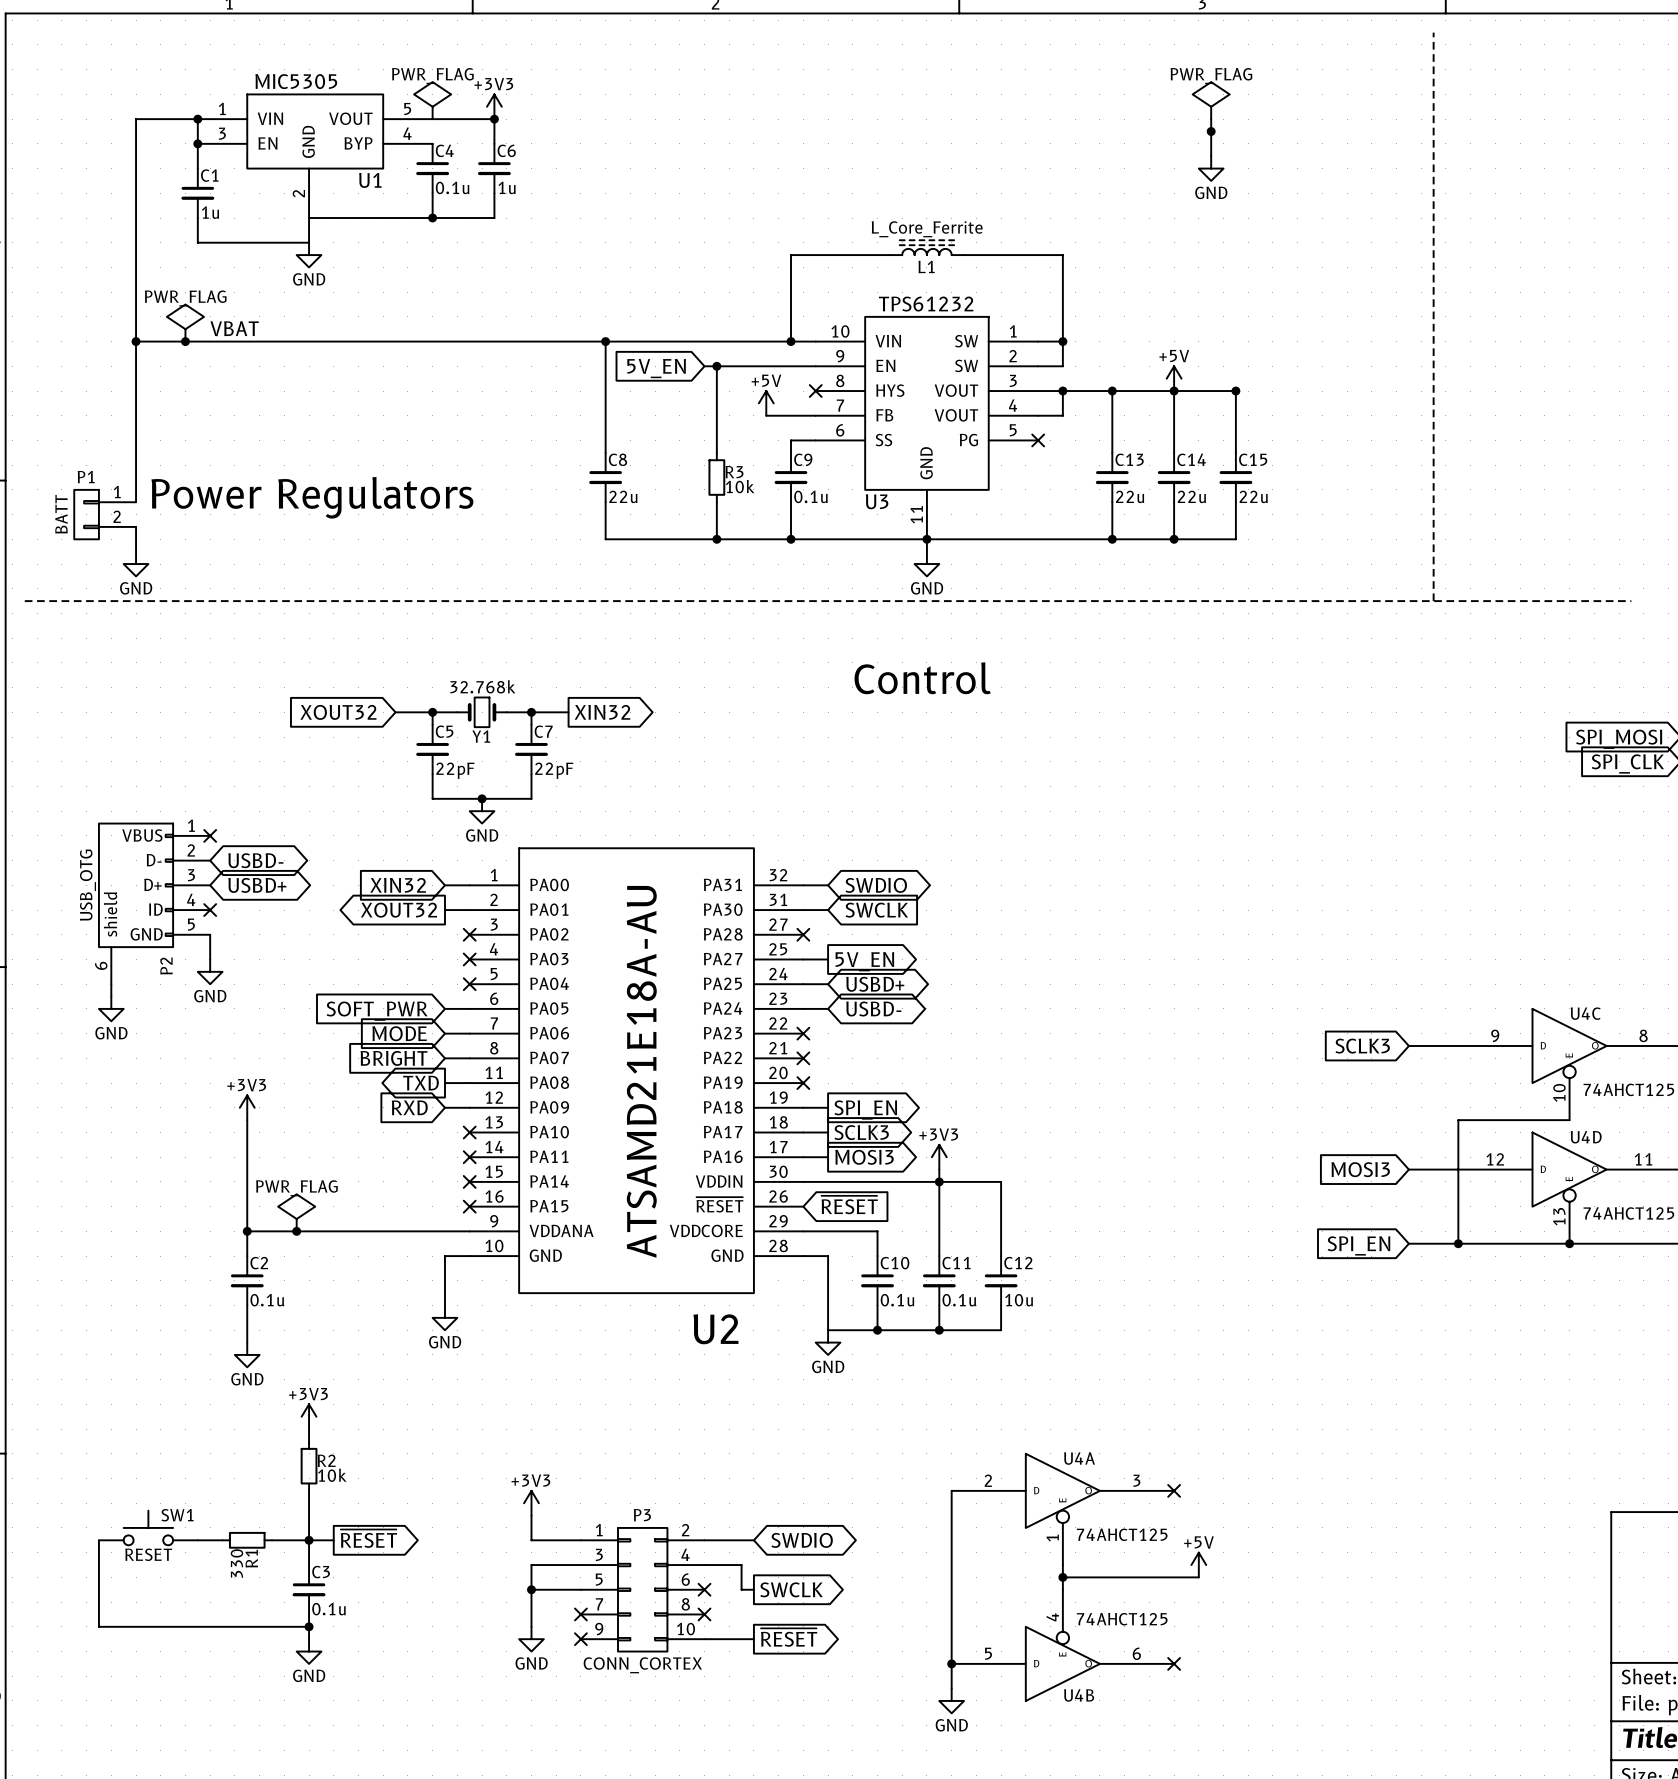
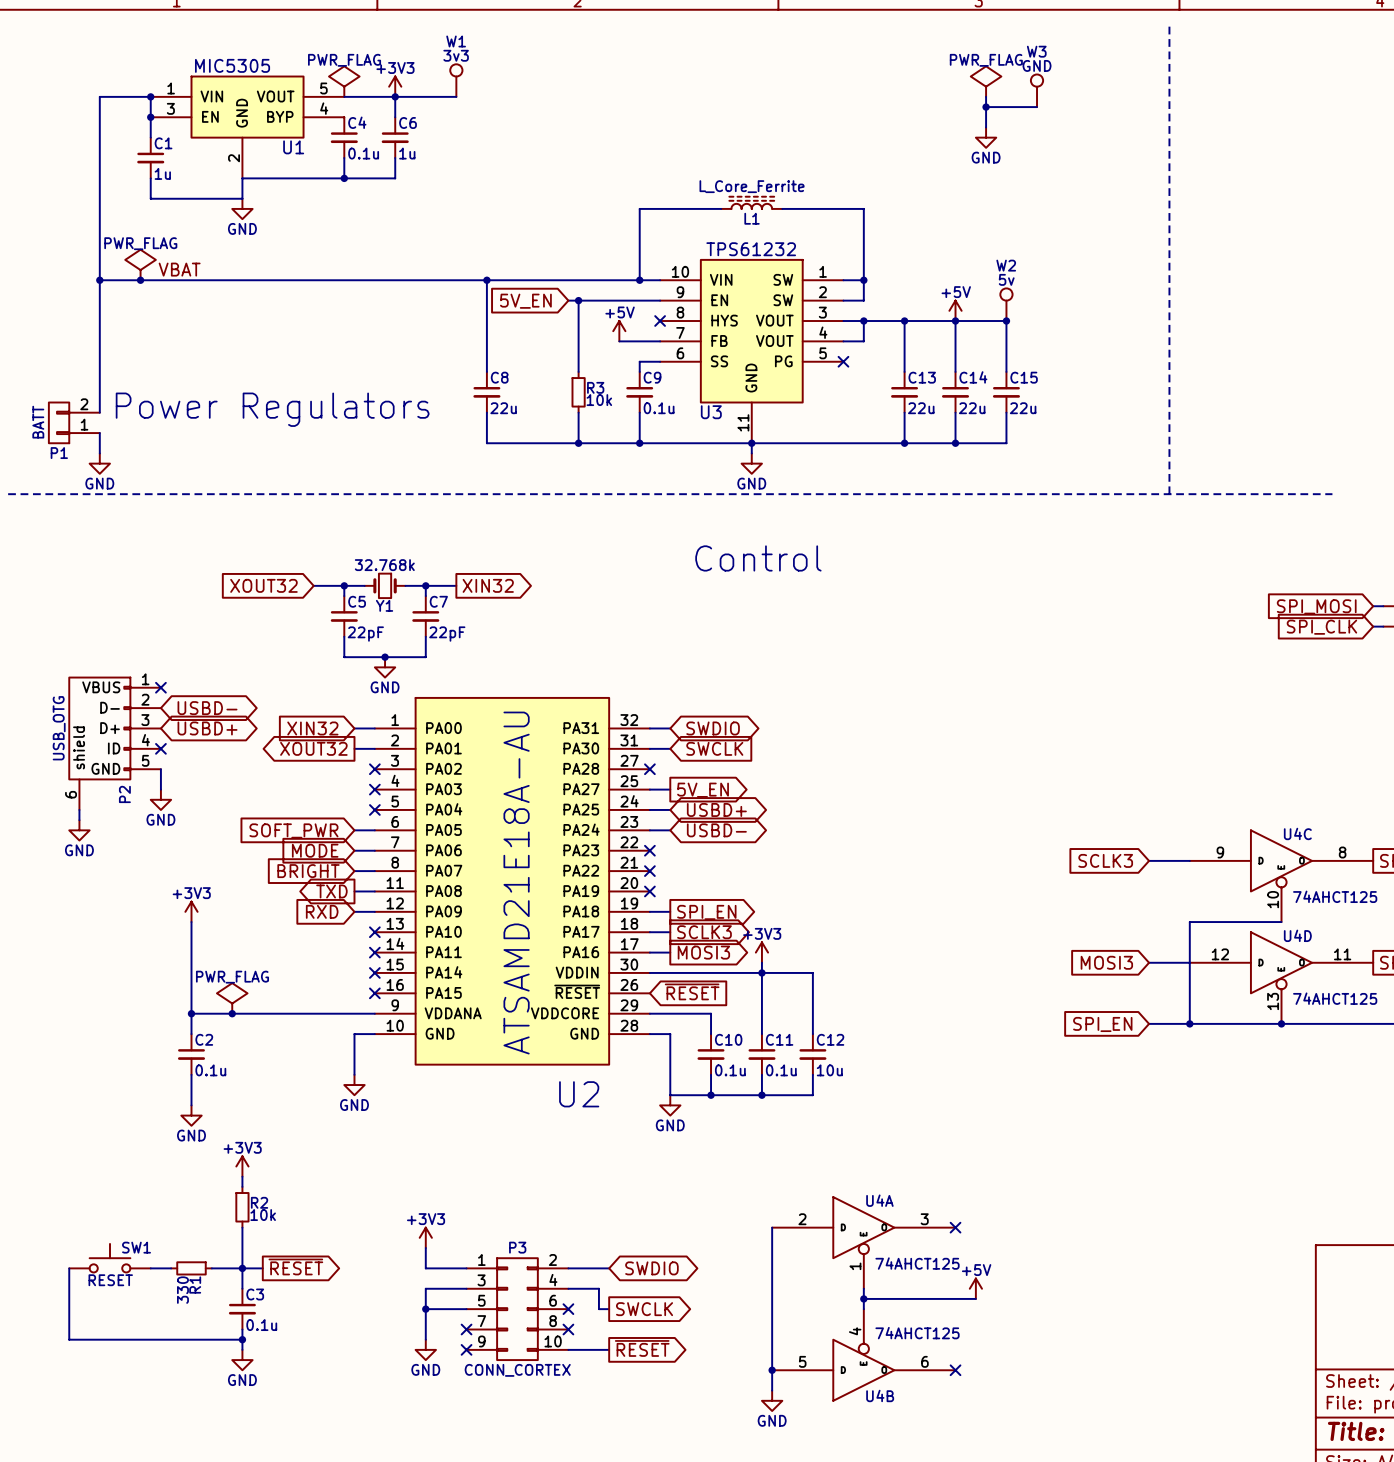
W1: none -> 3v3 (456, 80)
W3: none -> GND (1037, 90)
wire: none -> (395, 96) (456, 96)
wire: none -> (986, 107) (1037, 107)
W2: none -> 5v (1006, 304)
P1 flip: as is (86, 514) -> up-down (59, 422)

